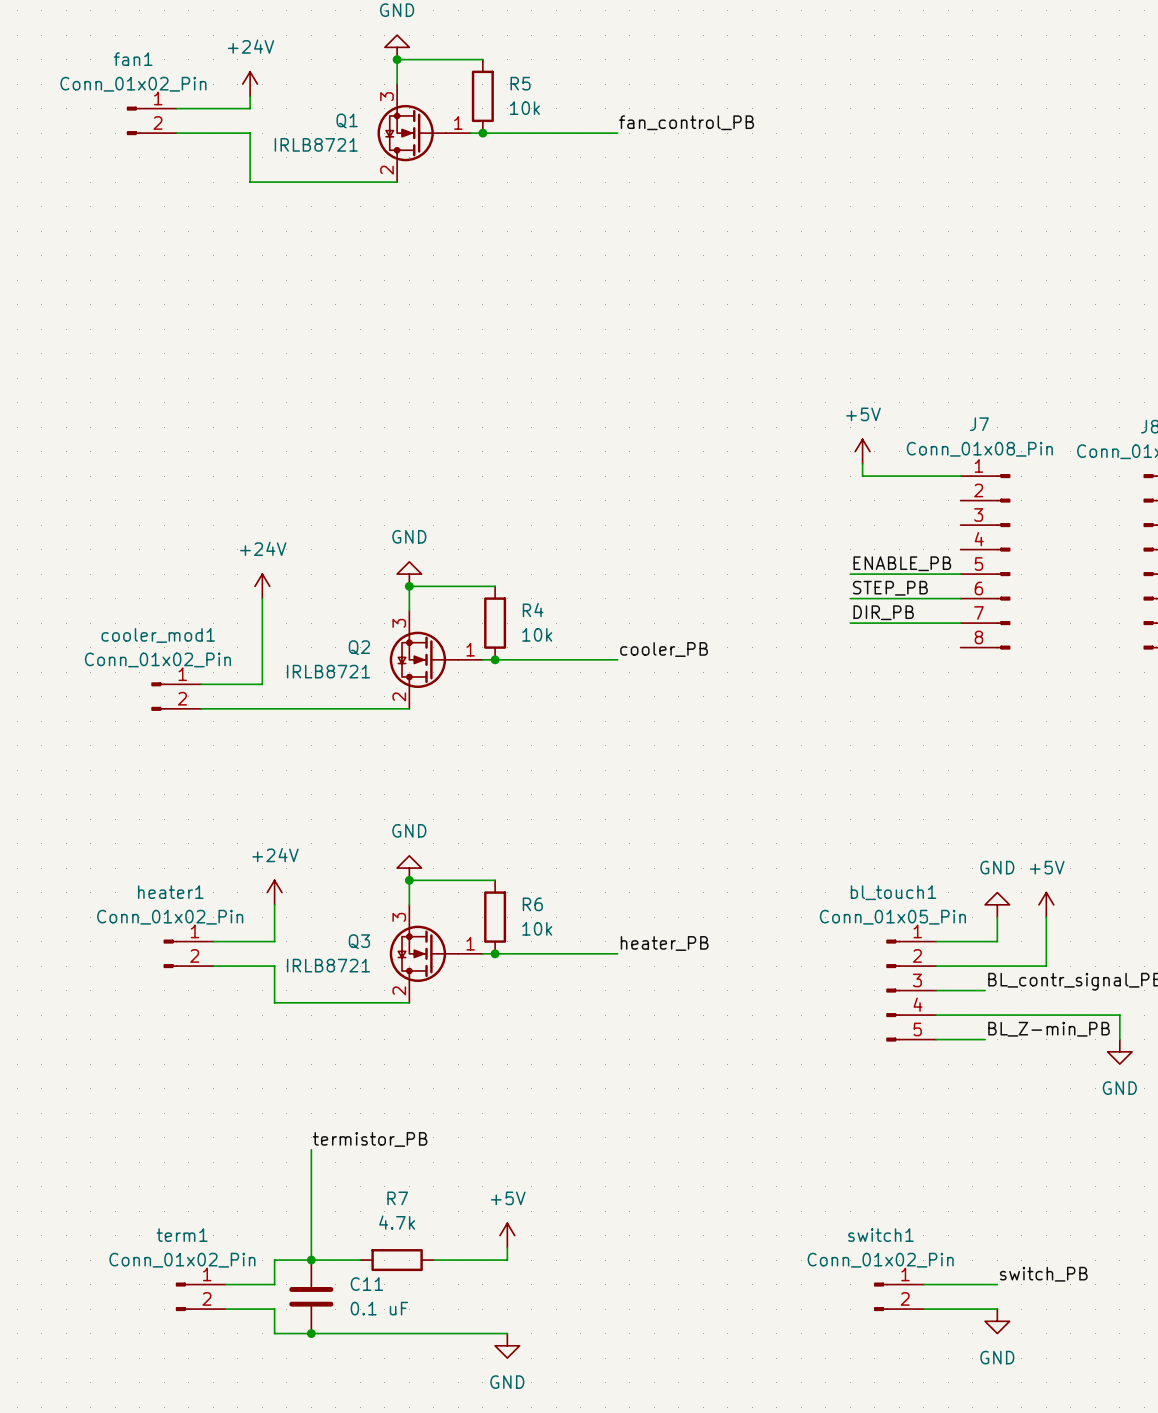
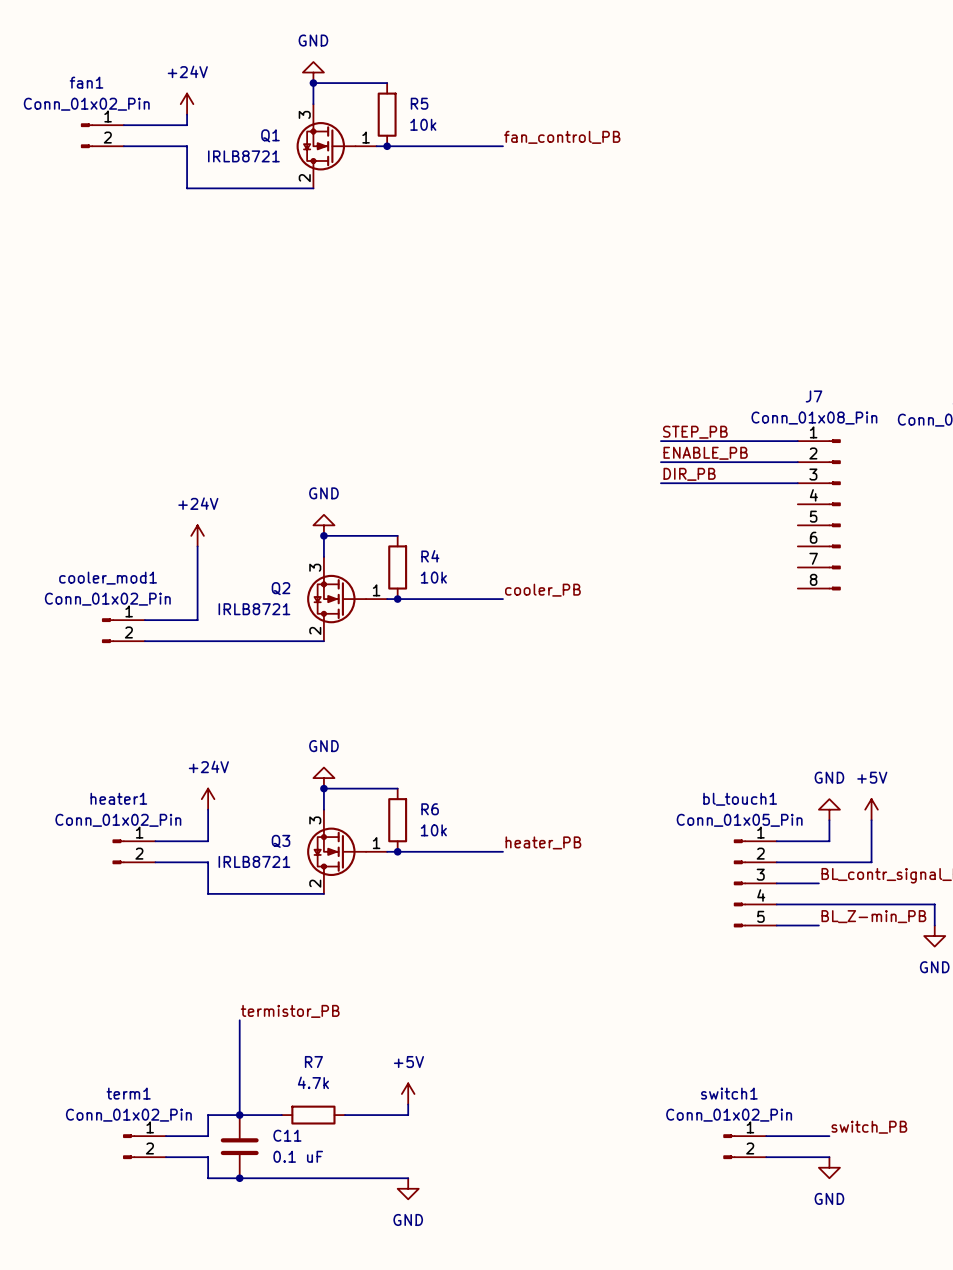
power symbol: +5V (862, 451) -> none
wire: (862, 463) (862, 476) -> (660, 441) (713, 441)
wire: none -> (660, 462) (797, 462)
wire: none -> (660, 483) (797, 483)
label position: ENABLE_PB (902, 563) -> ENABLE_PB (705, 453)
wire: (850, 574) (960, 574) -> none
label position: STEP_PB (890, 588) -> STEP_PB (695, 432)
wire: (850, 598) (960, 598) -> none
label position: DIR_PB (883, 612) -> DIR_PB (689, 474)
wire: (850, 623) (960, 623) -> none

